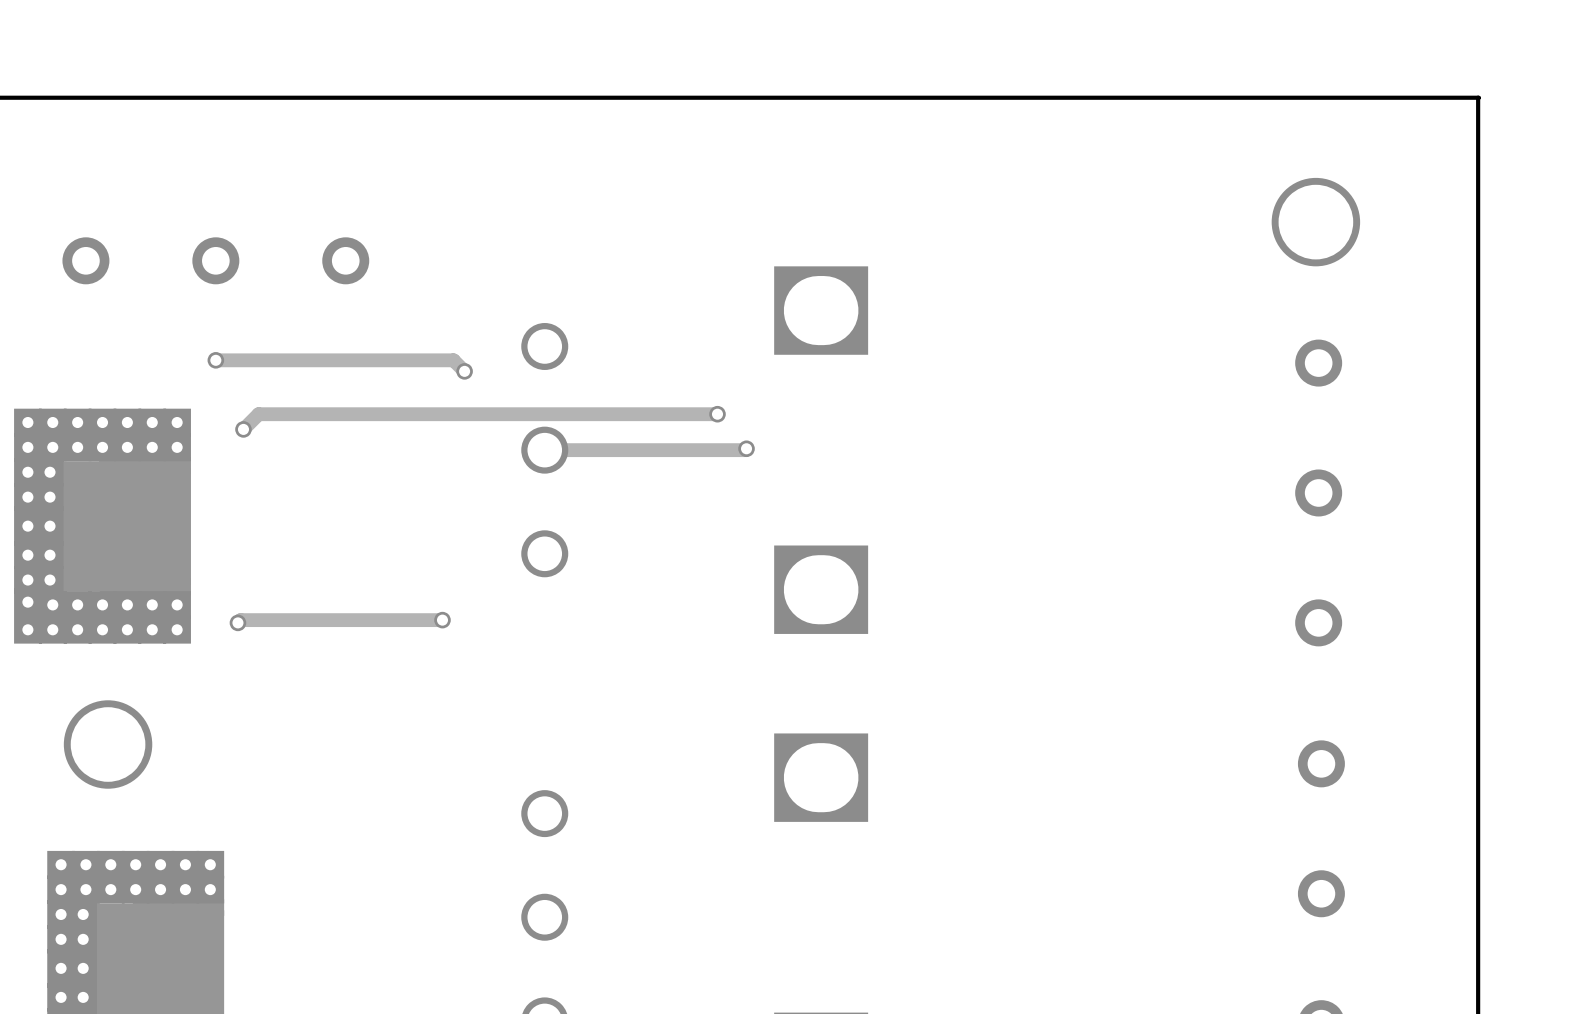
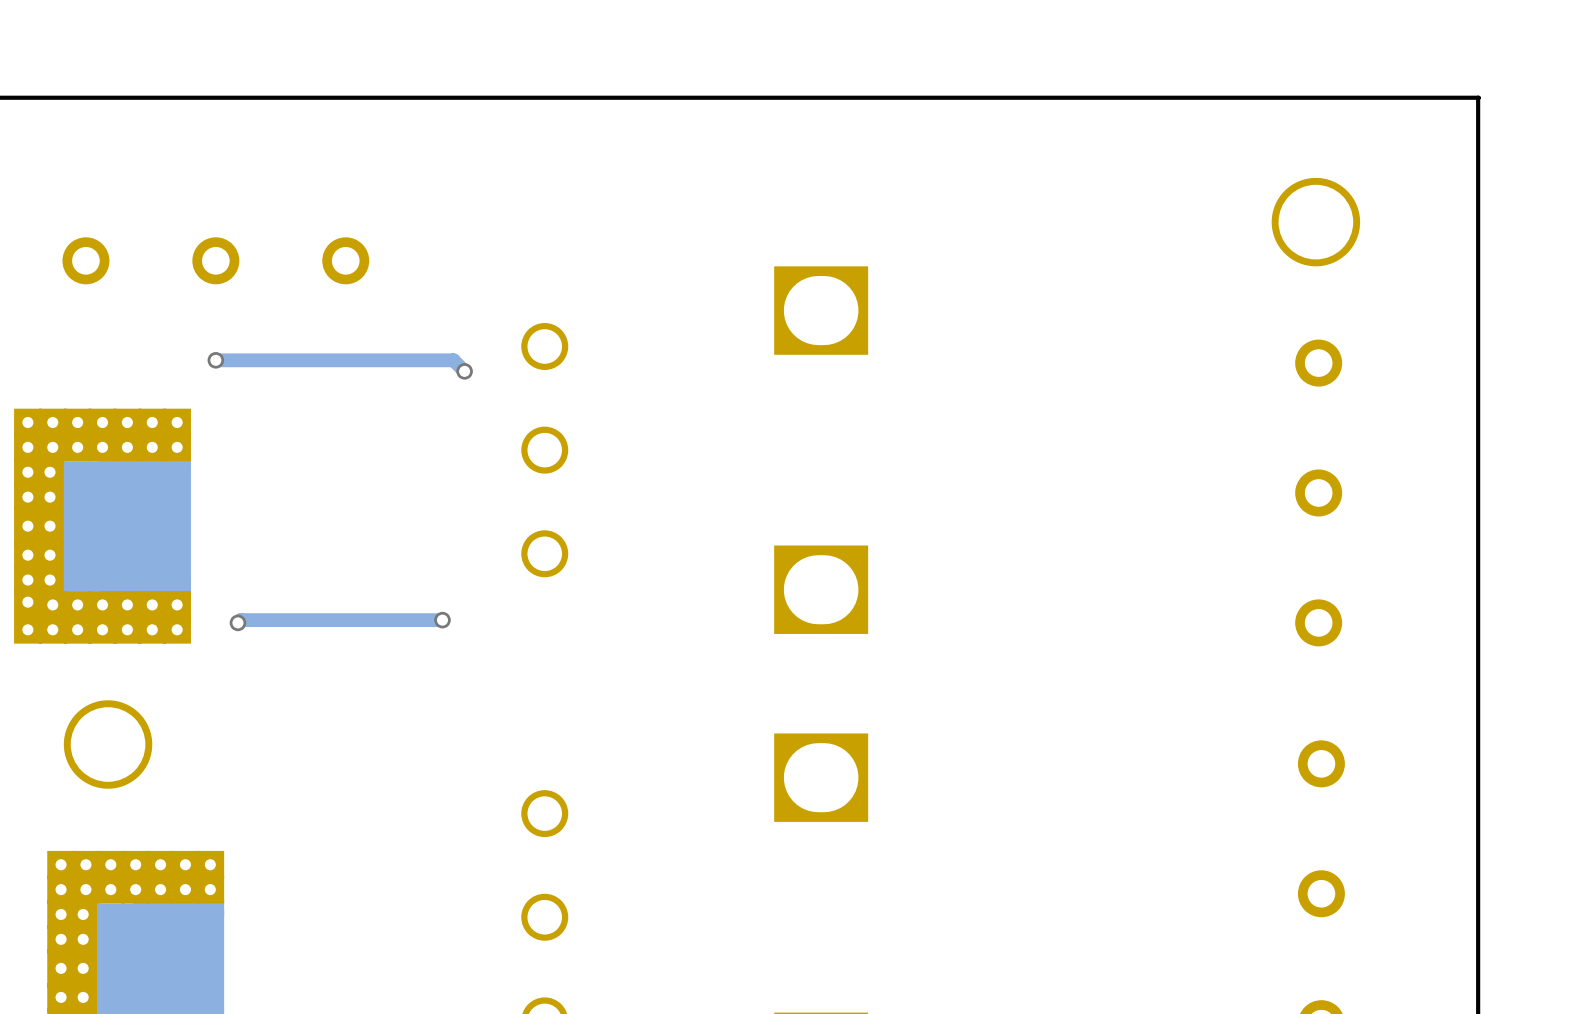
track: (717, 414) (258, 414) (243, 429) -> none
via: (717, 414) -> none
via: (243, 429) -> none
track: (746, 448) (544, 450) -> none
via: (746, 448) -> none

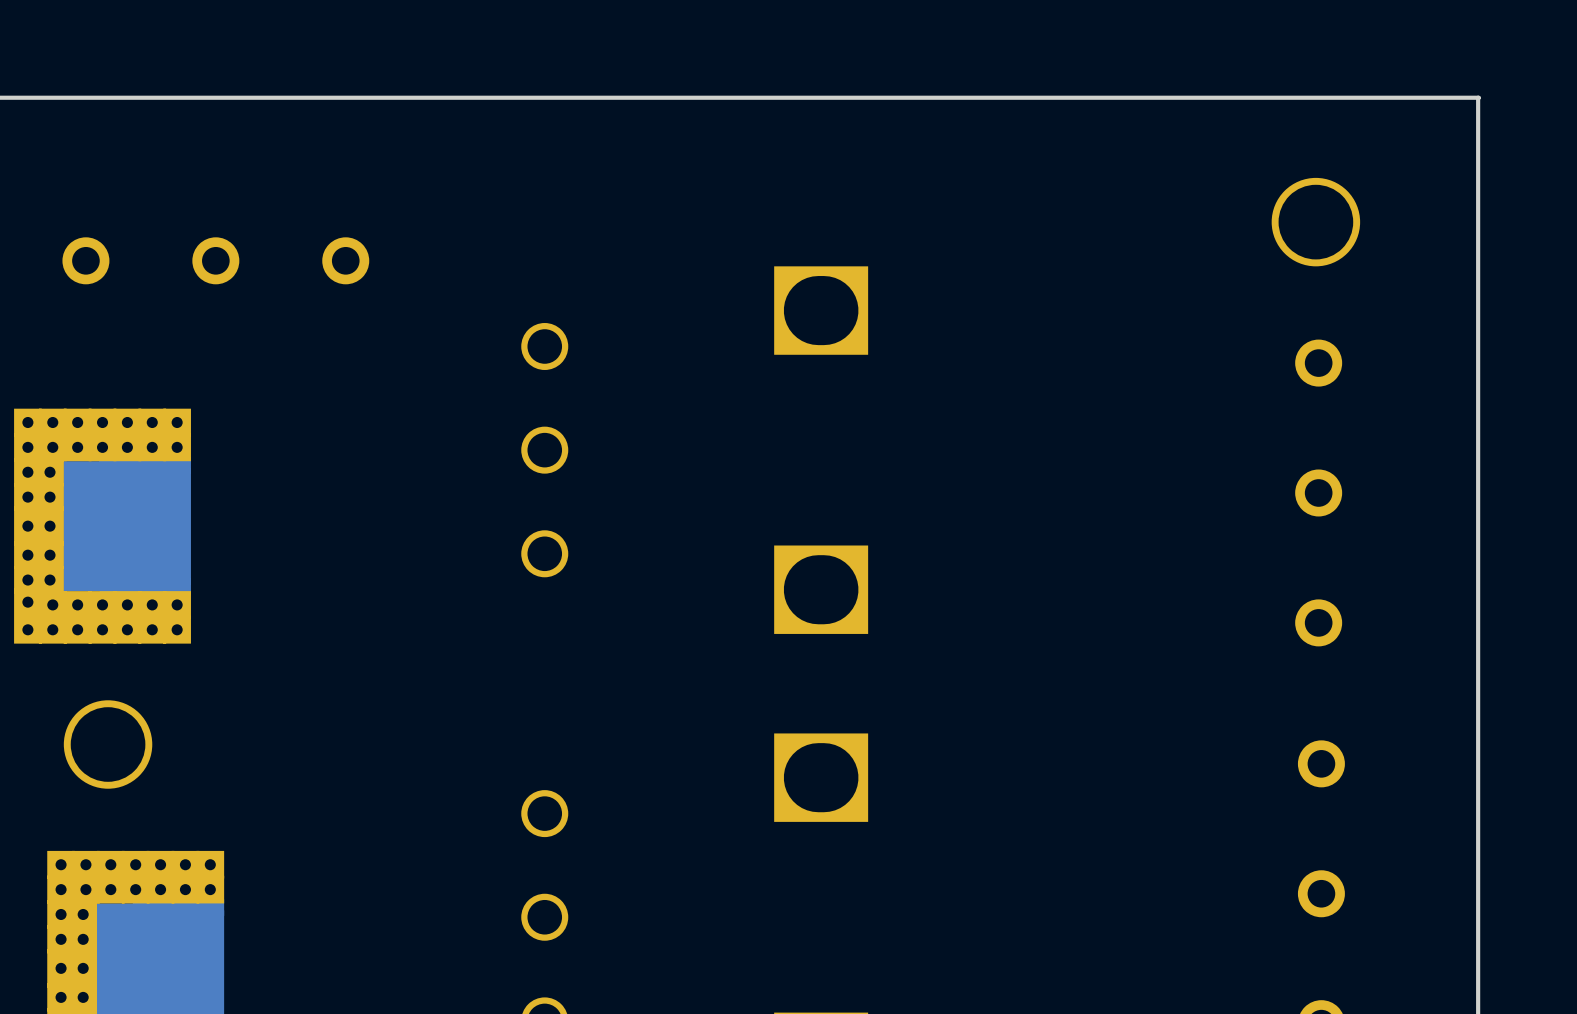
track: (215, 360) (453, 360) (464, 371) -> none
via: (215, 360) -> none
via: (464, 371) -> none
track: (442, 620) (240, 620) (237, 622) -> none
via: (442, 620) -> none
via: (237, 622) -> none

